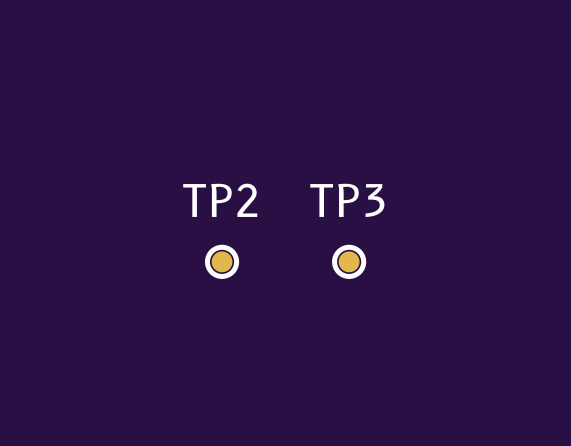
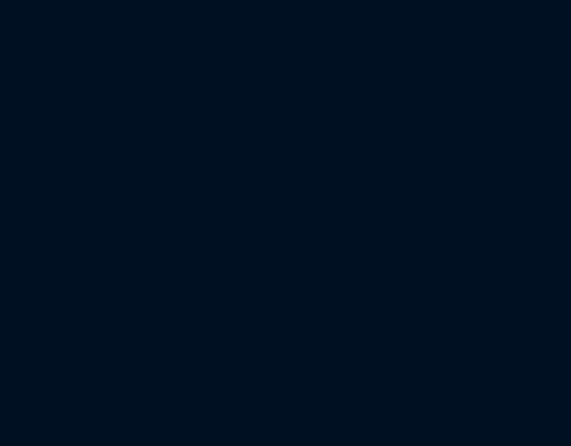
TP2: (222, 261) -> none
TP3: (349, 261) -> none

